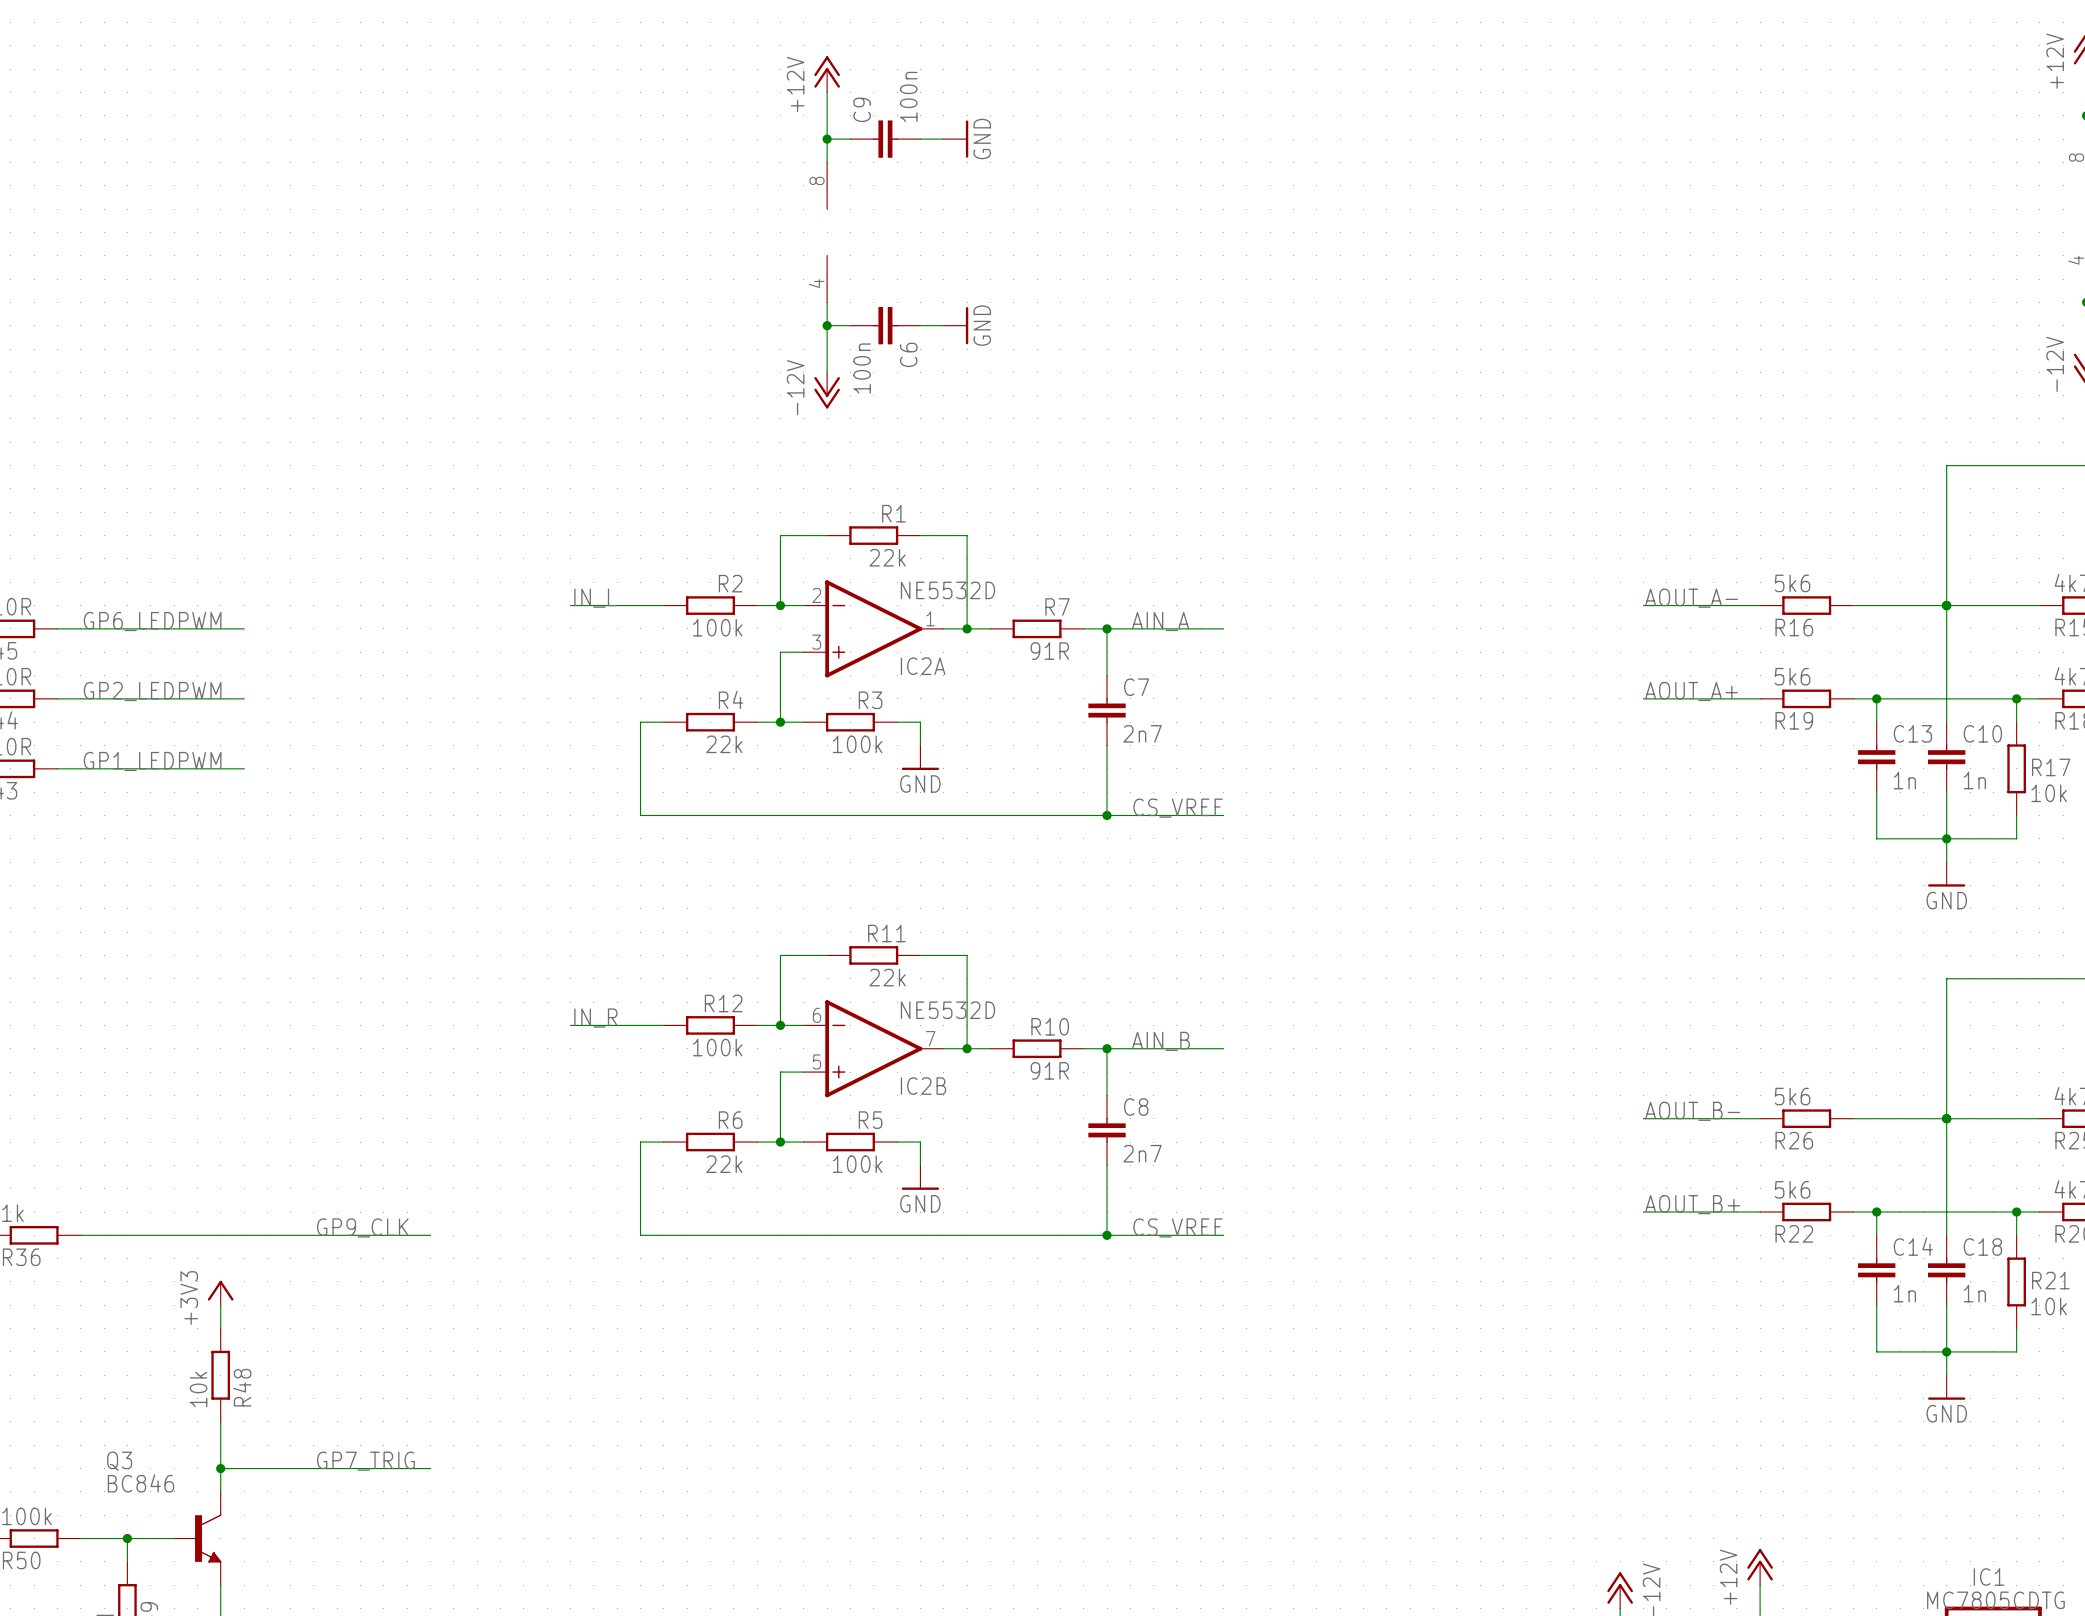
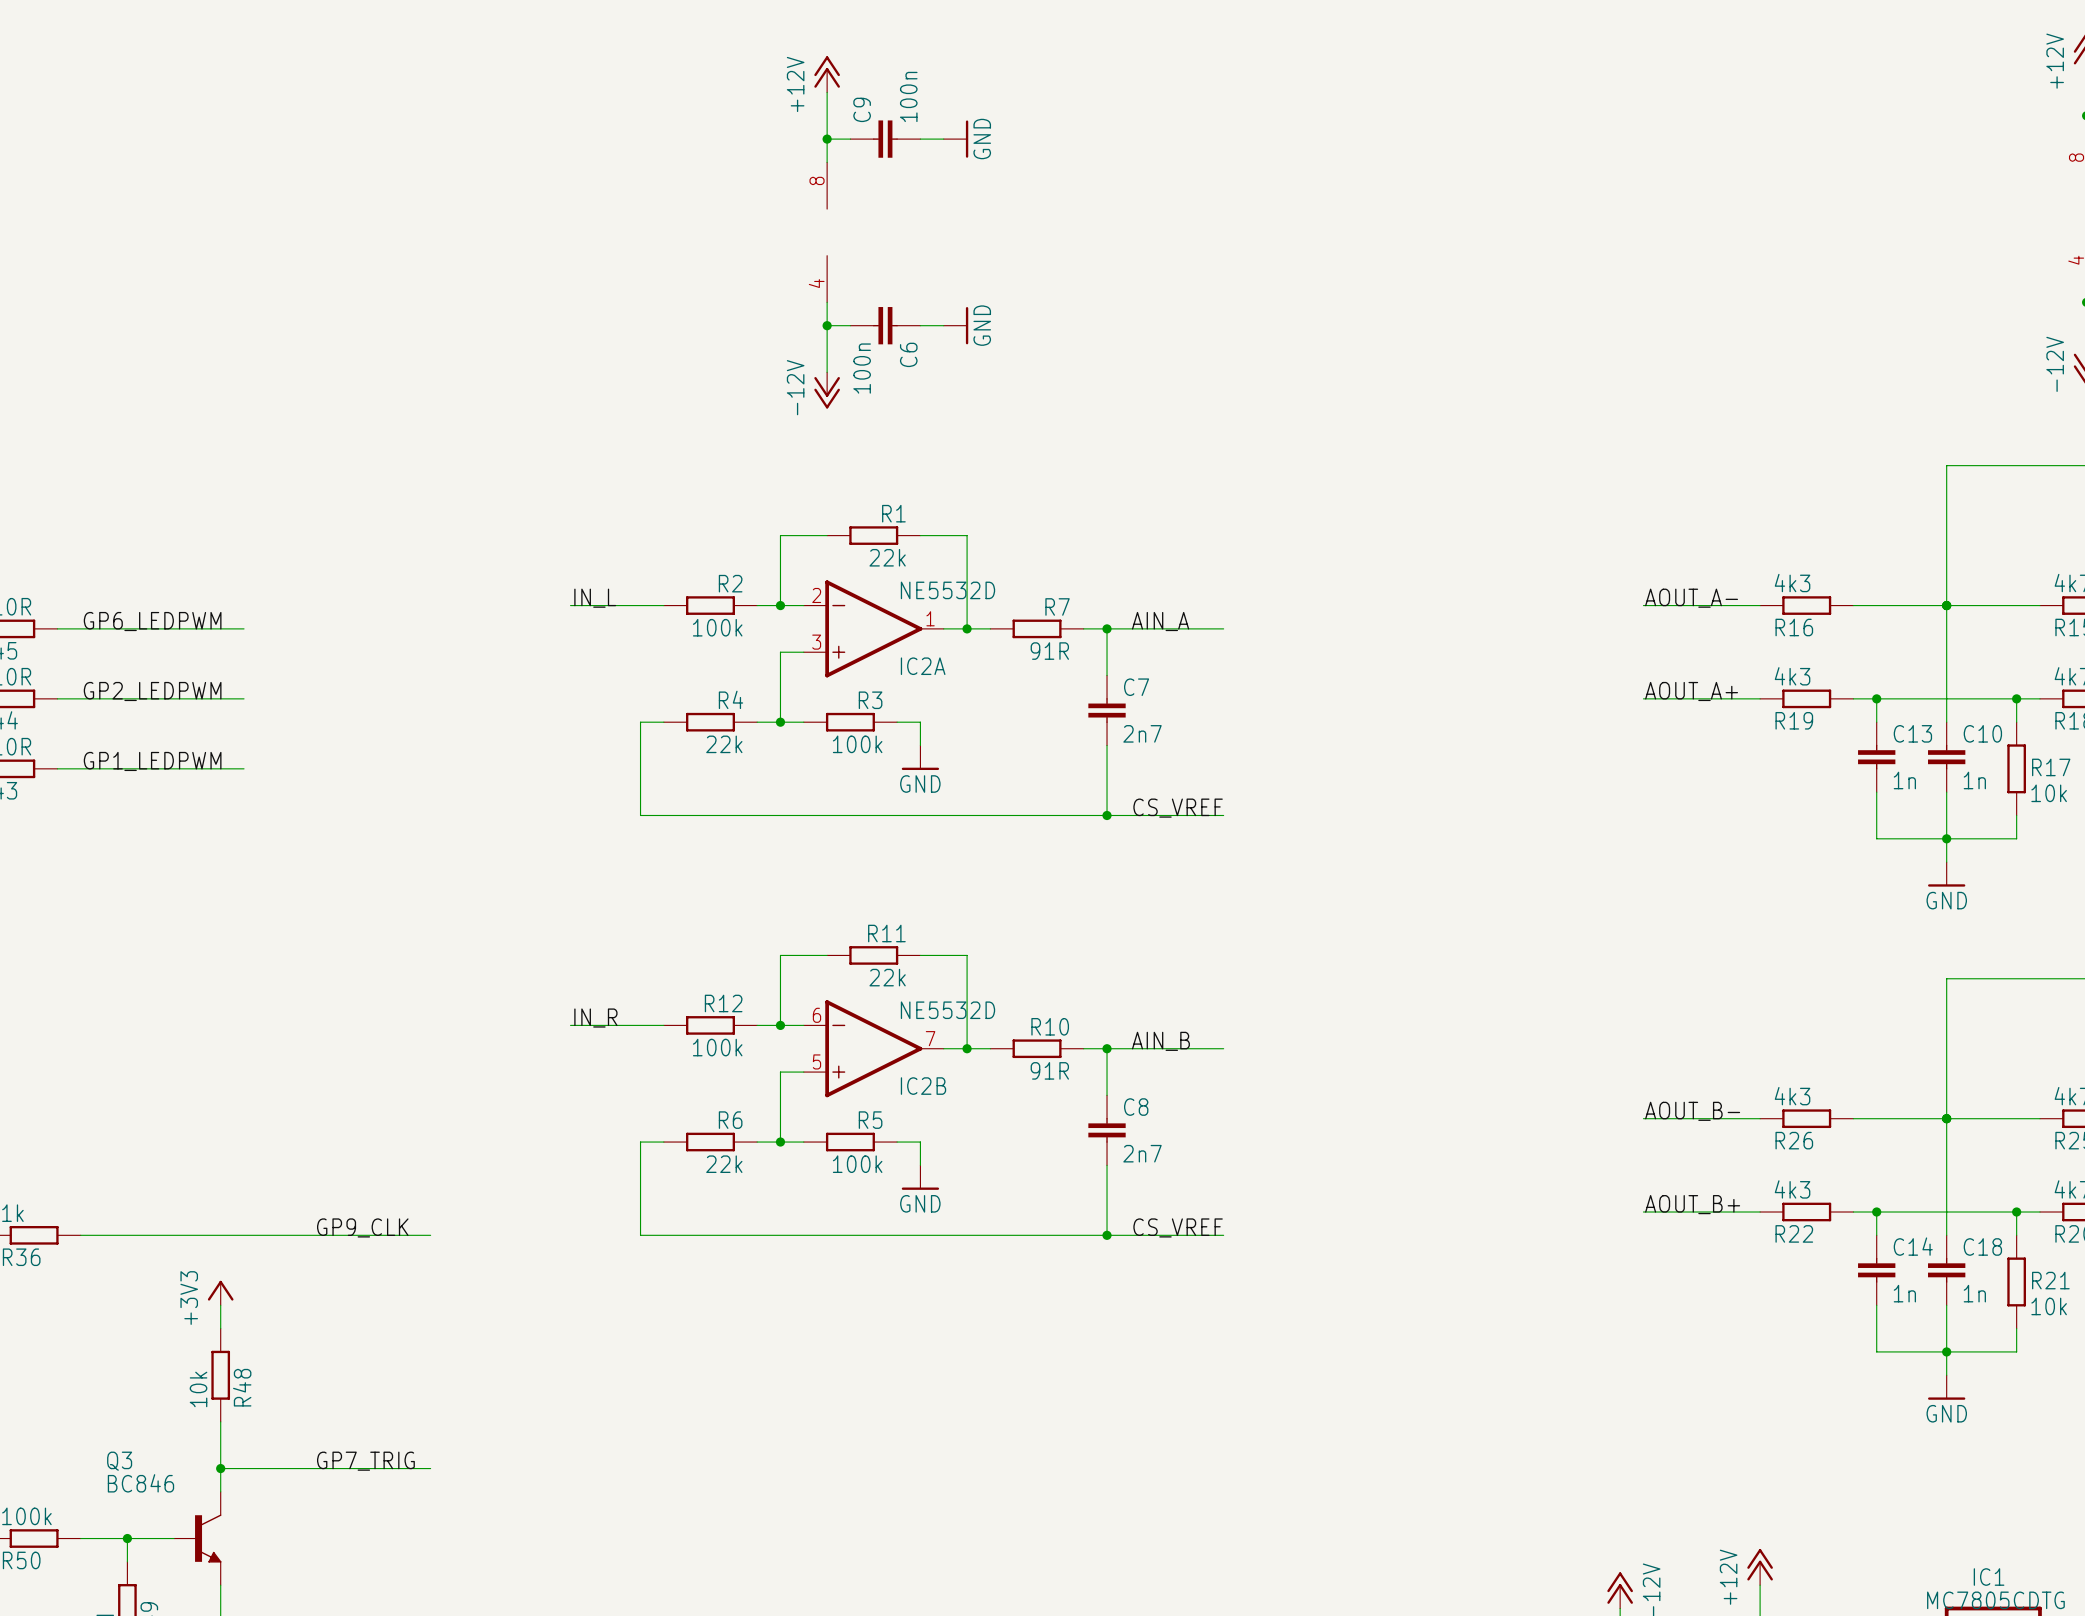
R16 value: 5k6 (1792, 583) -> 4k3 (1792, 583)
R19 value: 5k6 (1792, 676) -> 4k3 (1792, 676)
R26 value: 5k6 (1792, 1096) -> 4k3 (1792, 1096)
R22 value: 5k6 (1792, 1189) -> 4k3 (1792, 1189)

